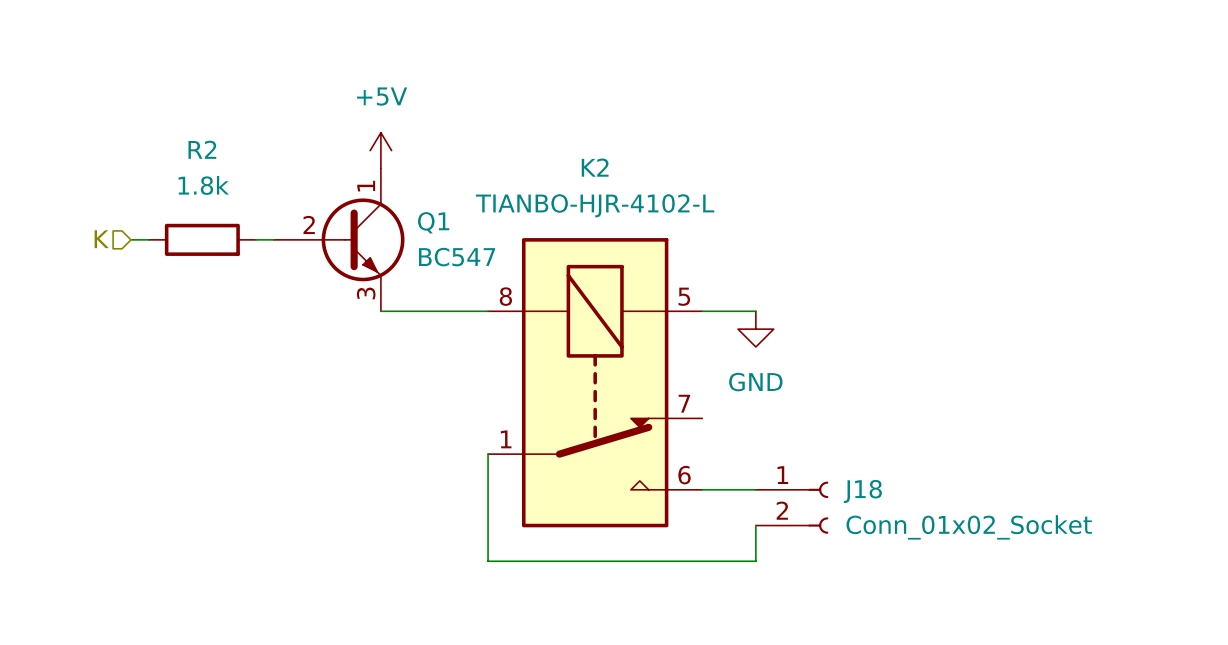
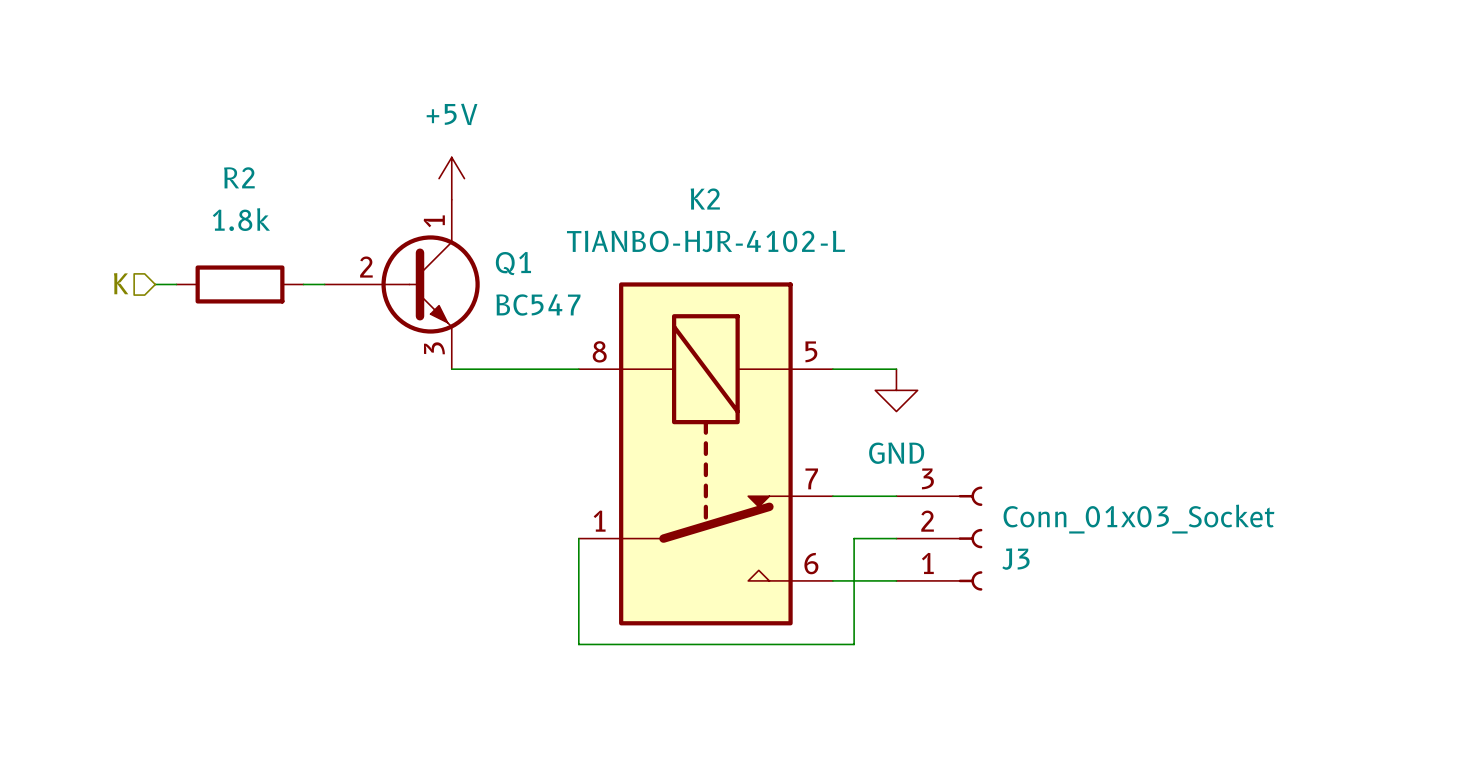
wire: none -> (832, 496) (896, 496)
J3: none -> Conn_01x03_Socket (939, 538)
J18: Conn_01x02_Socket (792, 507) -> none
wire: (755, 525) (755, 561) (488, 561) (488, 543) -> (896, 538) (854, 538) (854, 644) (578, 644)

